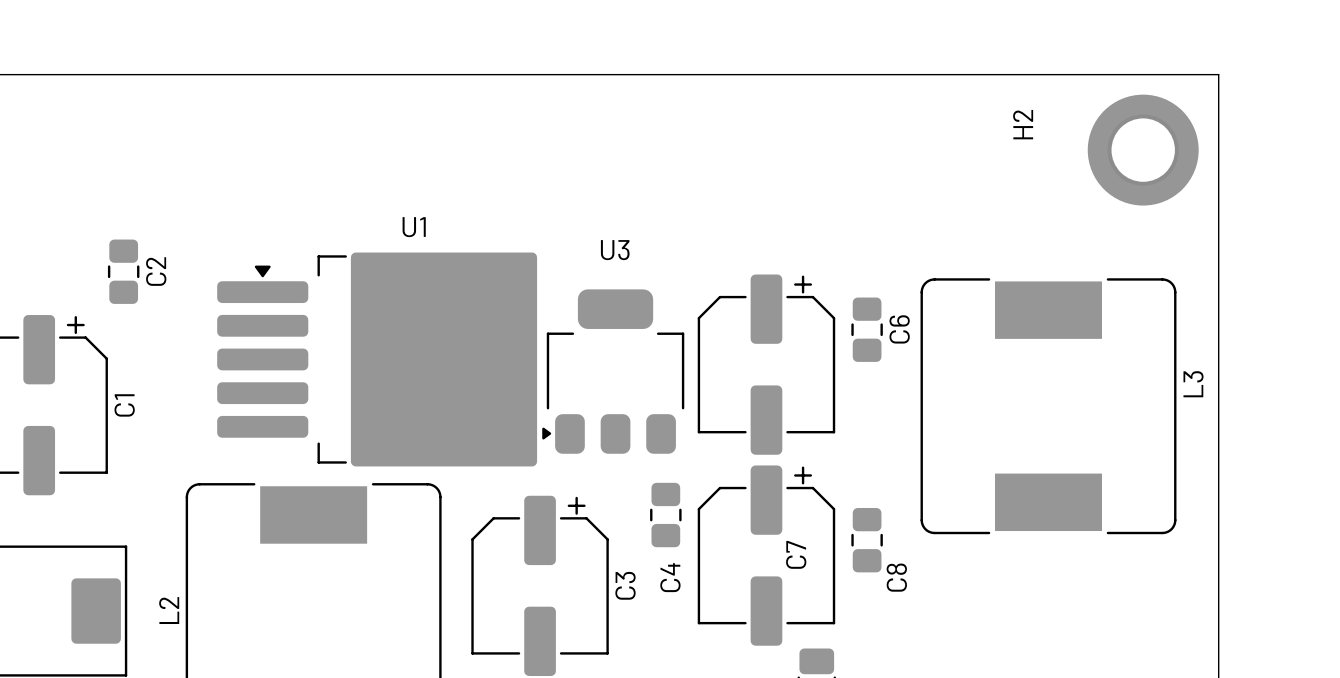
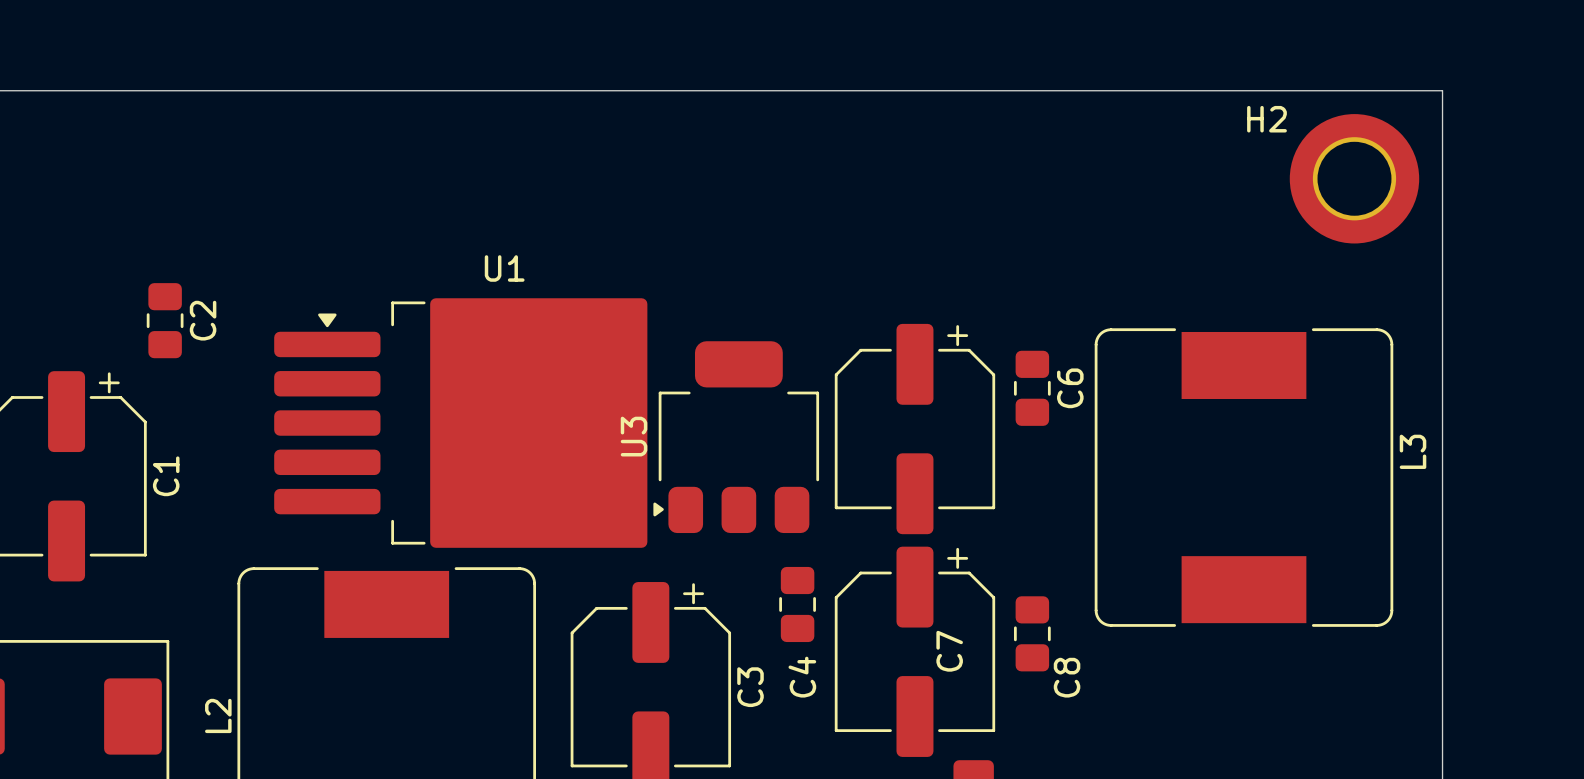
H2 name rotation: 0° (1023, 124) -> 90° clockwise (1266, 119)
H2 name position: H2 (1023, 124) -> H2 (1266, 119)
U3 name rotation: 0° (615, 250) -> 90° counterclockwise (634, 436)
U3 name position: U3 (615, 250) -> U3 (634, 436)

